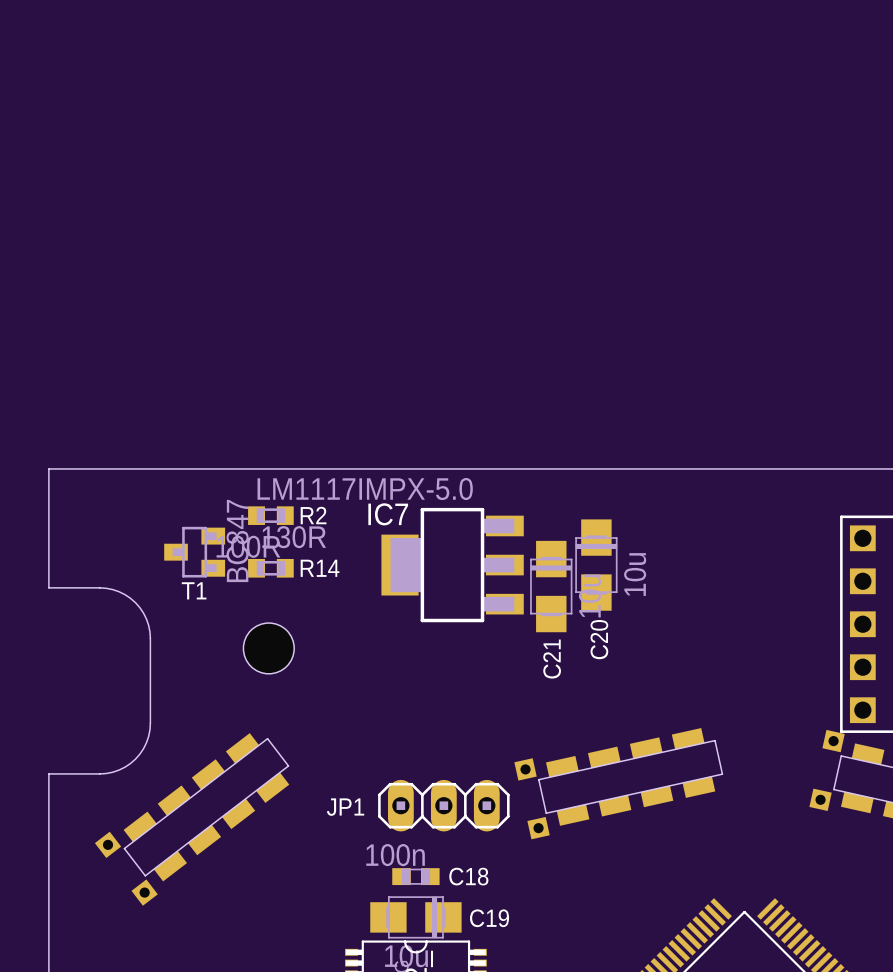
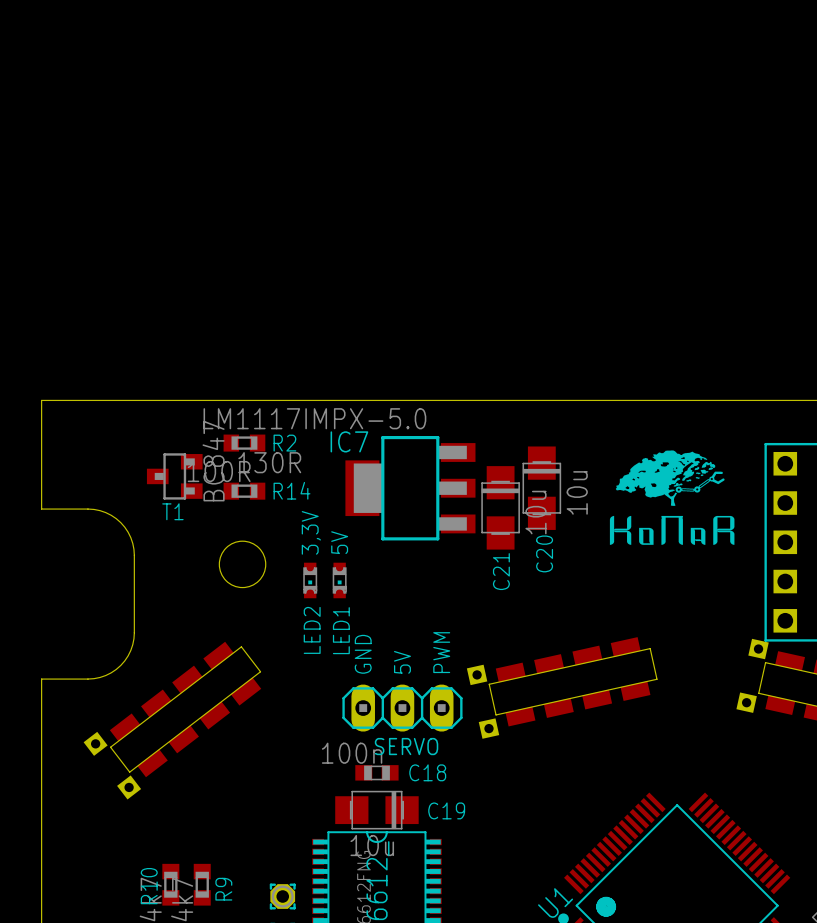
drawing: none -> [609, 450, 735, 545]
text: none -> 3,3V (311, 532)
text: none -> 5V (339, 542)
LED2: none -> (310, 580)
LED1: none -> (339, 580)
text: none -> PWM (441, 652)
text: none -> GND (363, 654)
text: none -> 5V (402, 662)
JP1 name: JP1 (345, 807) -> SERVO (406, 746)

